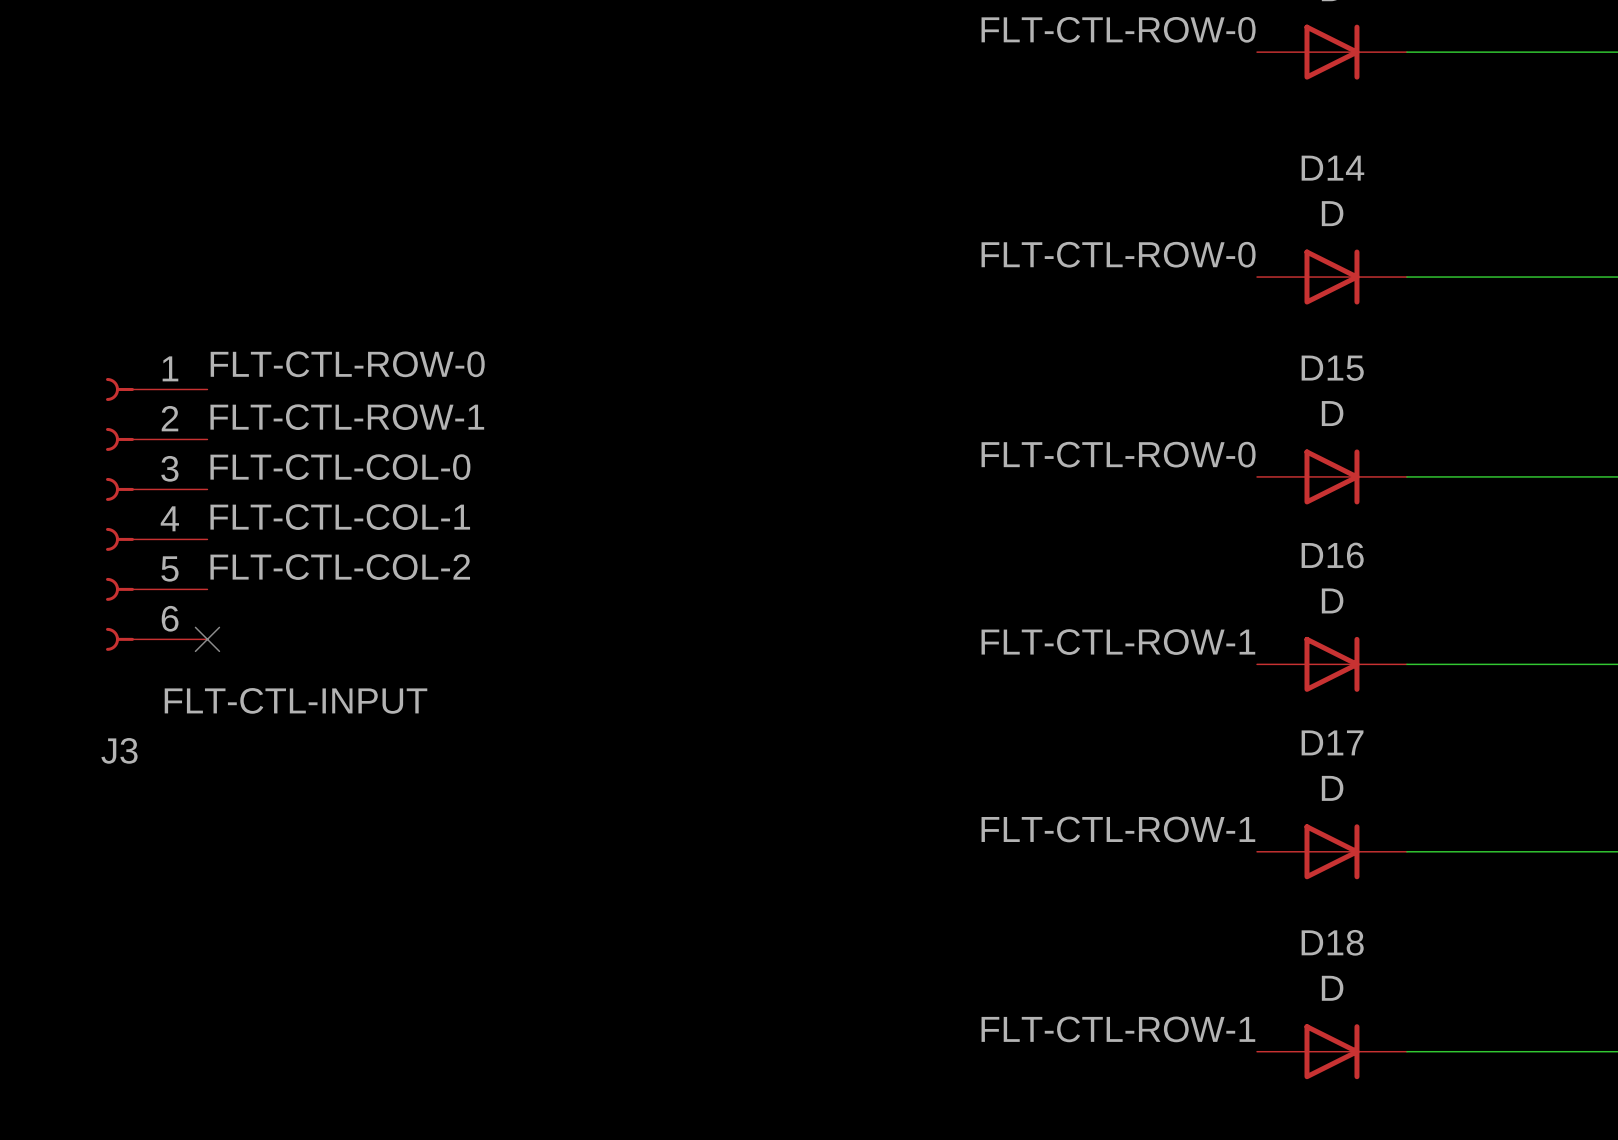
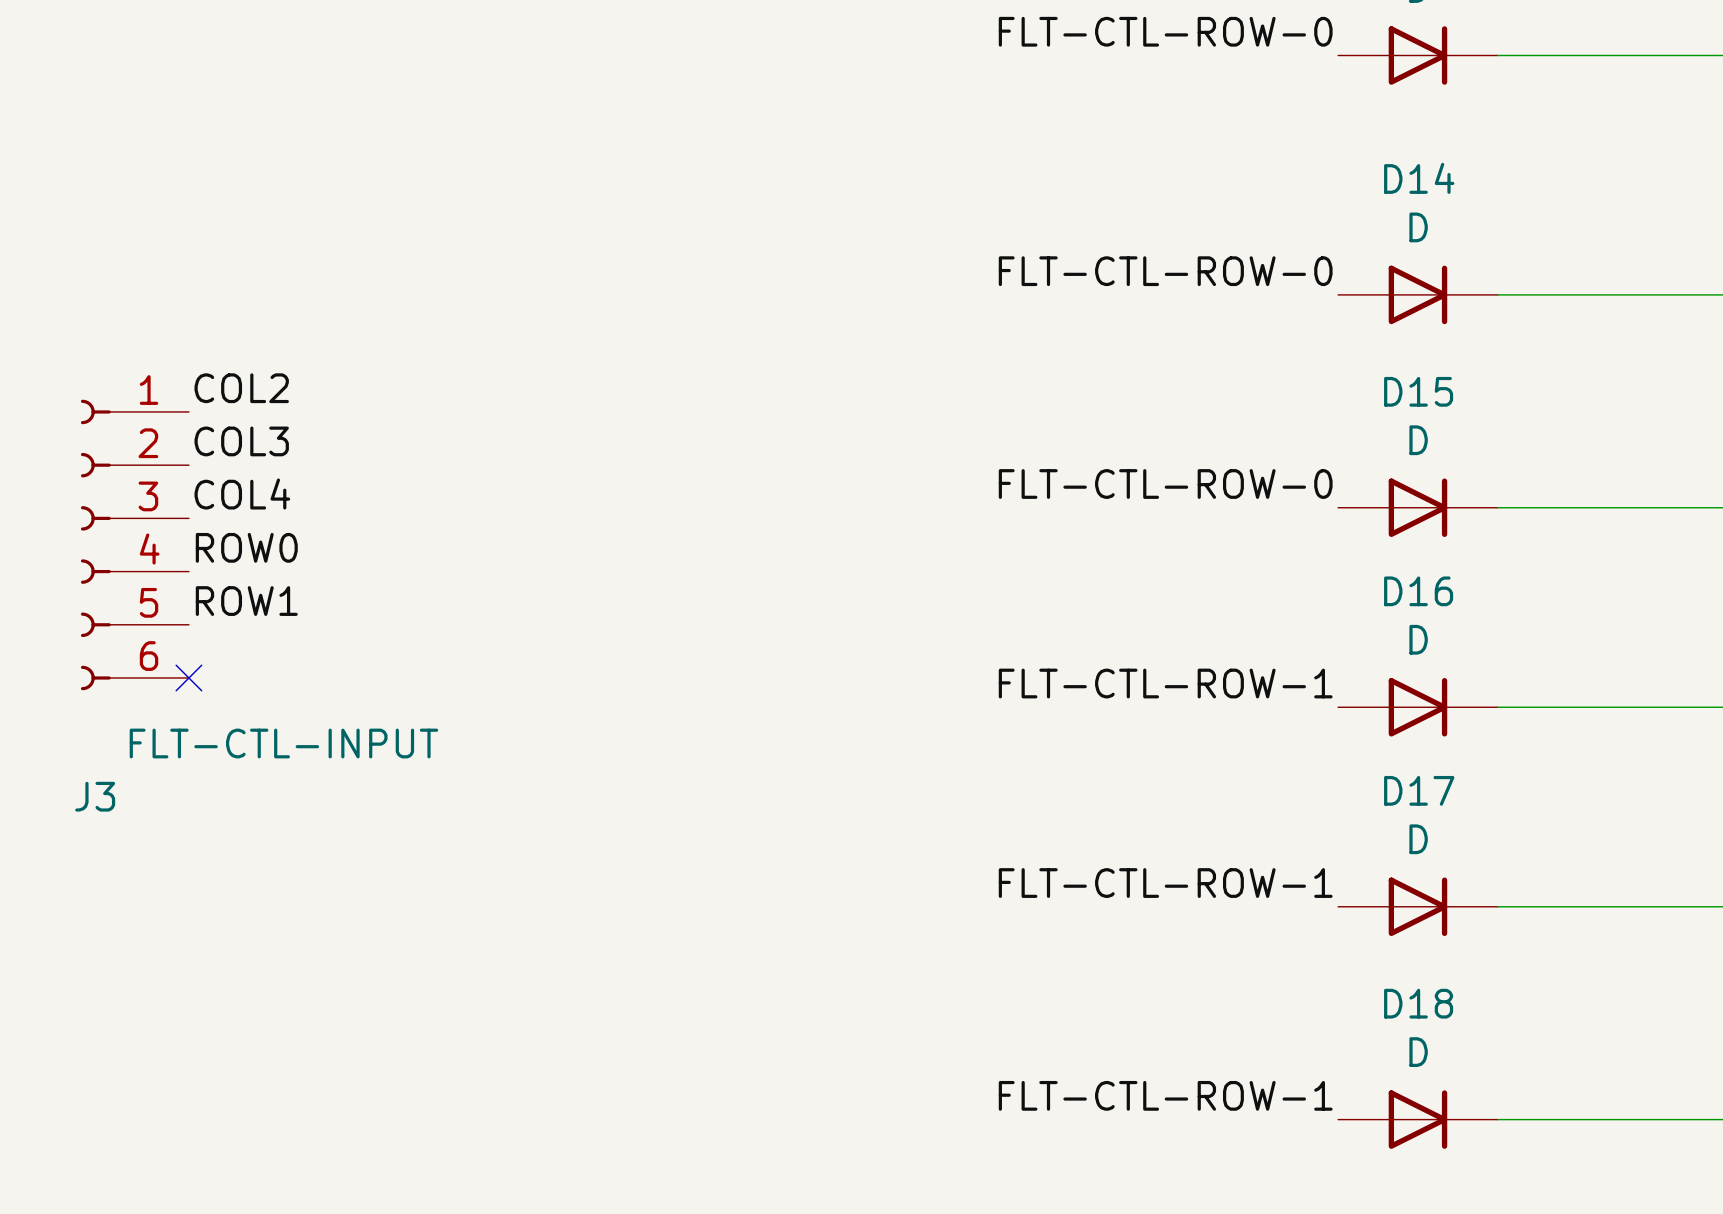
label: none -> COL2 (241, 388)
label: FLT-CTL-ROW-0 (347, 364) -> none
label: none -> COL3 (241, 441)
label: FLT-CTL-ROW-1 (347, 417) -> none
label: none -> COL4 (242, 494)
label: FLT-CTL-COL-0 (340, 467) -> none
J3 position: (156, 514) -> (134, 544)
label: none -> ROW0 (246, 547)
label: FLT-CTL-COL-1 (340, 517) -> none
label: none -> ROW1 (246, 601)
label: FLT-CTL-COL-2 (340, 567) -> none
no-connect mark position: (207, 639) -> (188, 677)

